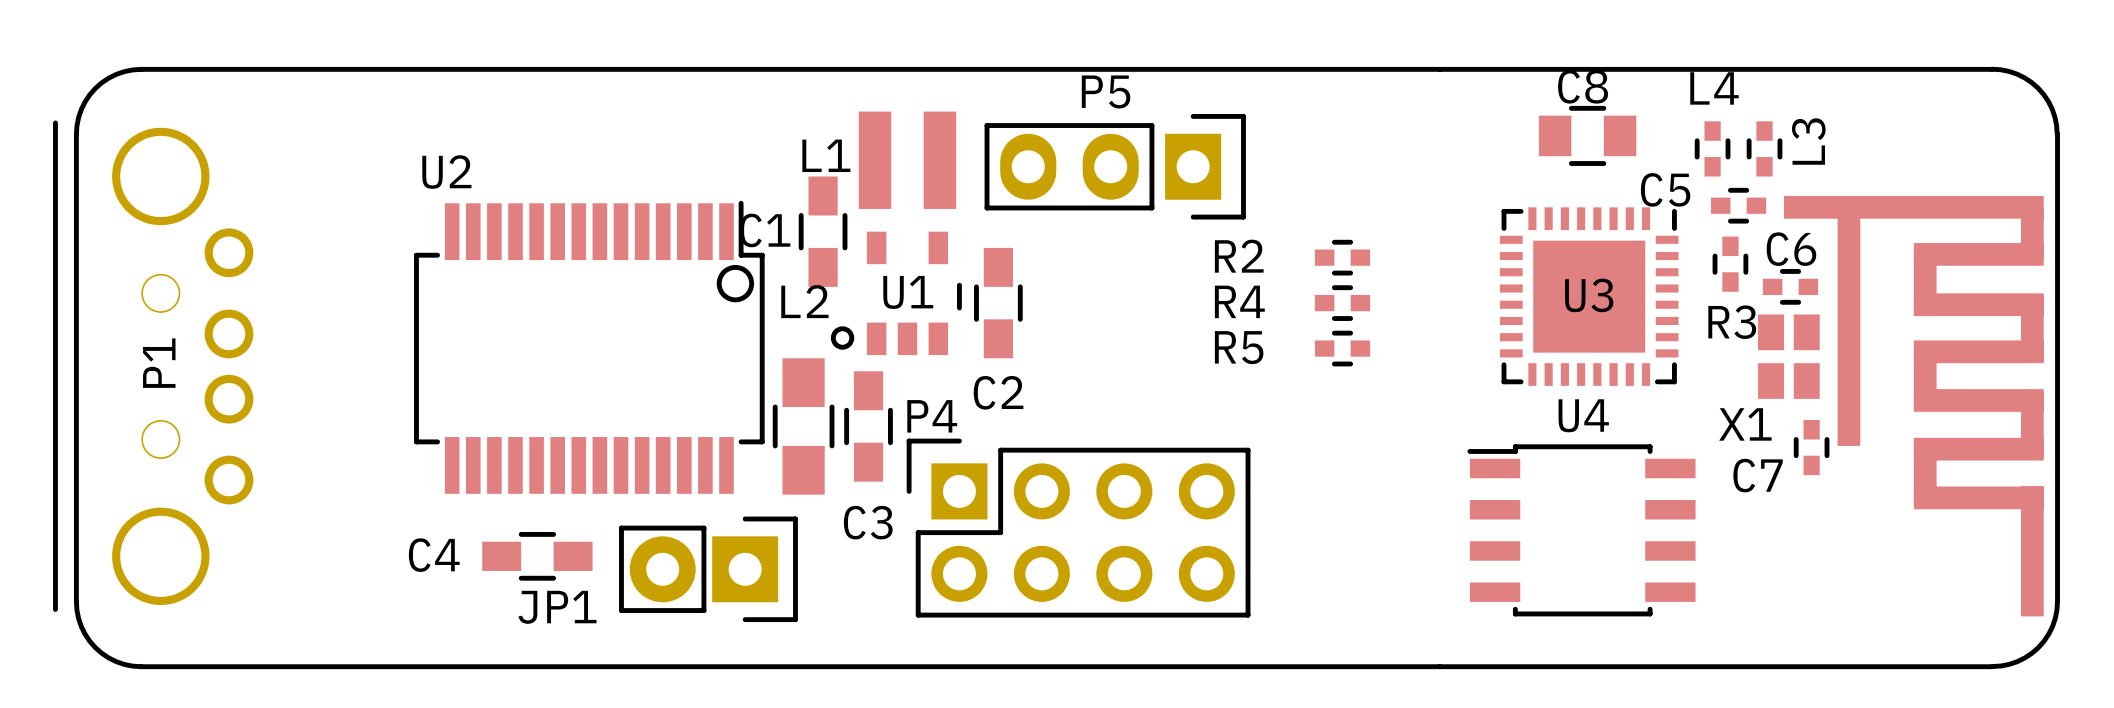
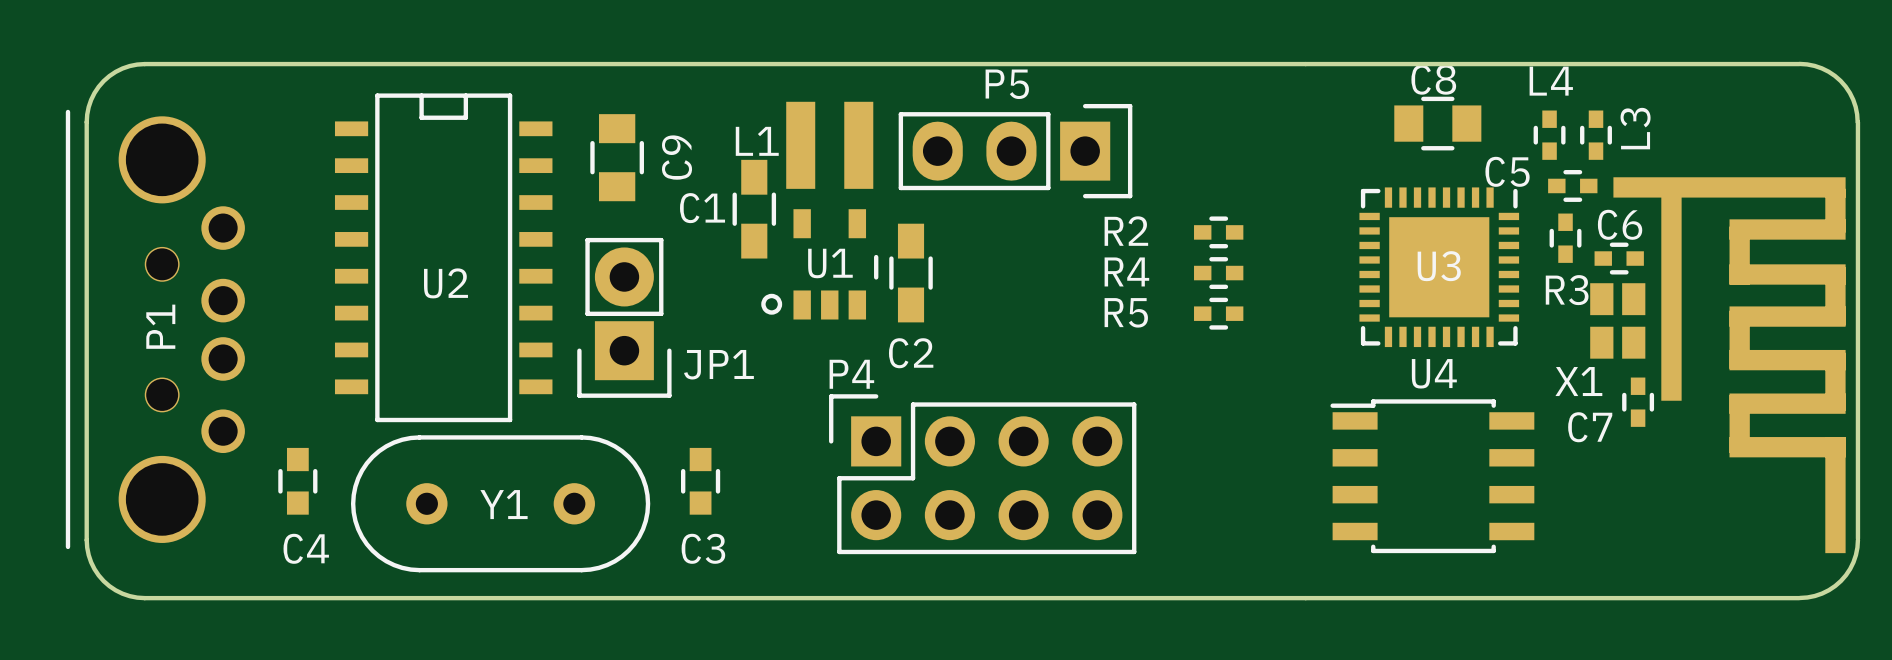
U2 name position: U2 (446, 172) -> U2 (445, 283)
C9: none -> (617, 157)
U2 footprint: [414, 200, 765, 494] -> [334, 93, 553, 423]
C3 footprint: [844, 371, 893, 482] -> [681, 447, 721, 515]
L2: (803, 426) -> none
C4 footprint: [482, 531, 593, 581] -> [278, 447, 318, 515]
C4 name position: C4 (434, 555) -> C4 (306, 548)
Y1: none -> (500, 503)
JP1 rotation: 0° (708, 569) -> 90° clockwise (624, 317)
JP1 position: (708, 569) -> (624, 317)
JP1 name position: JP1 (557, 607) -> JP1 (718, 364)

